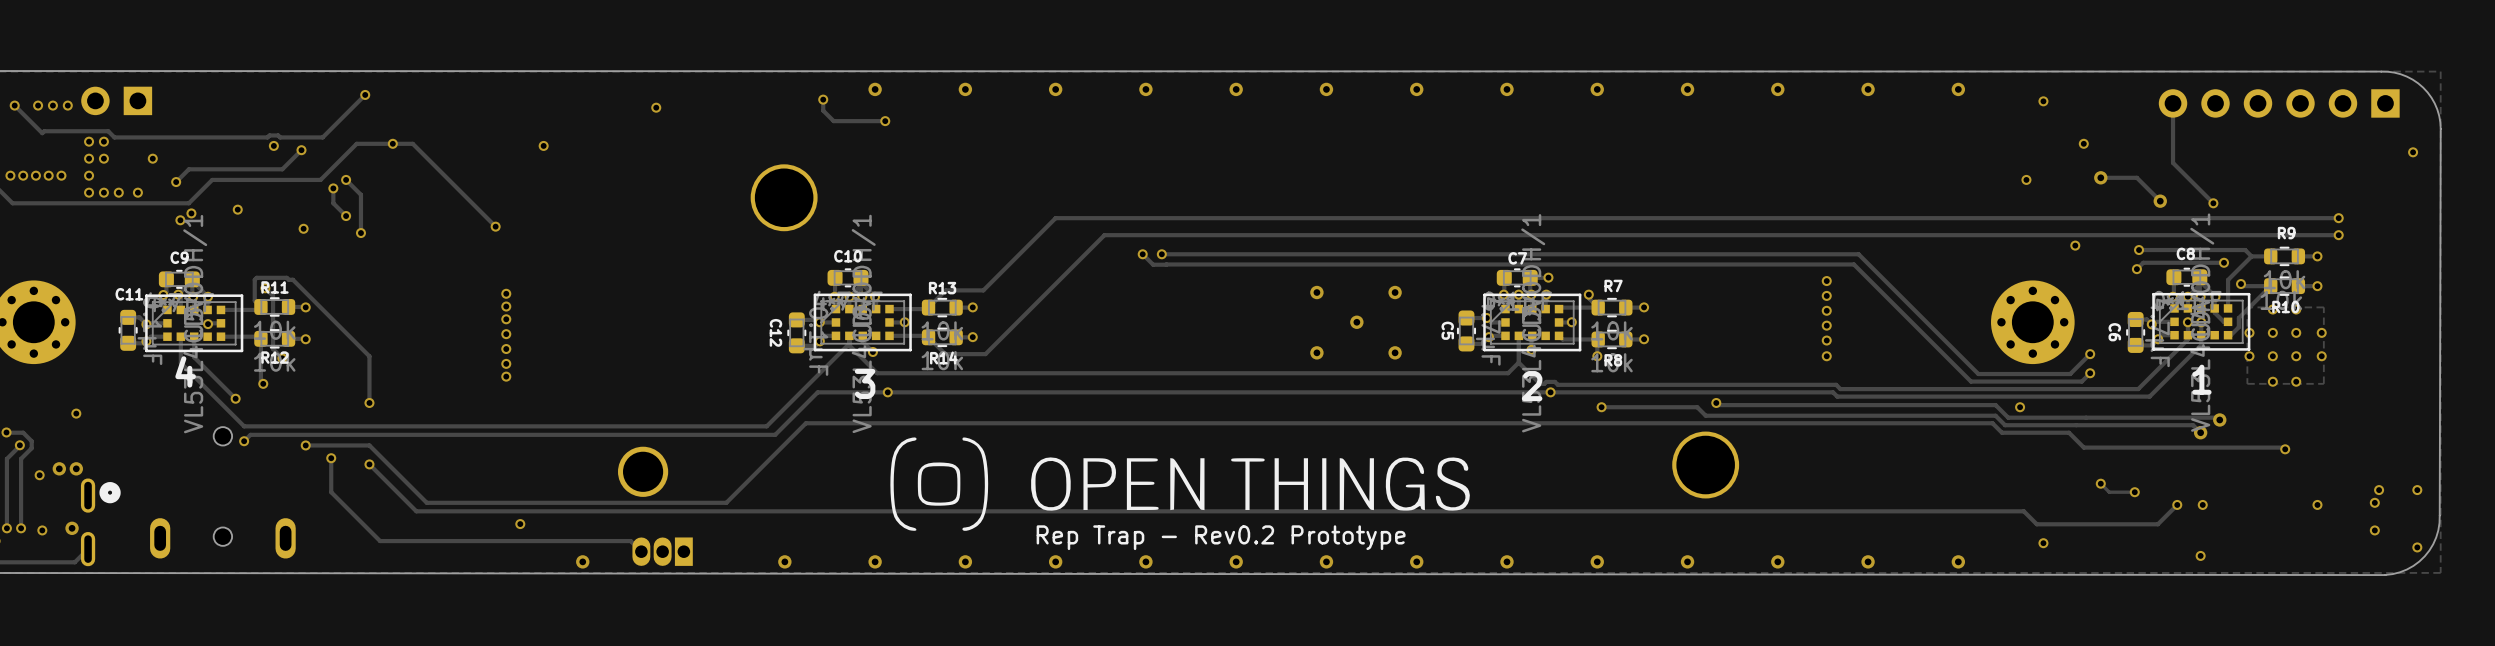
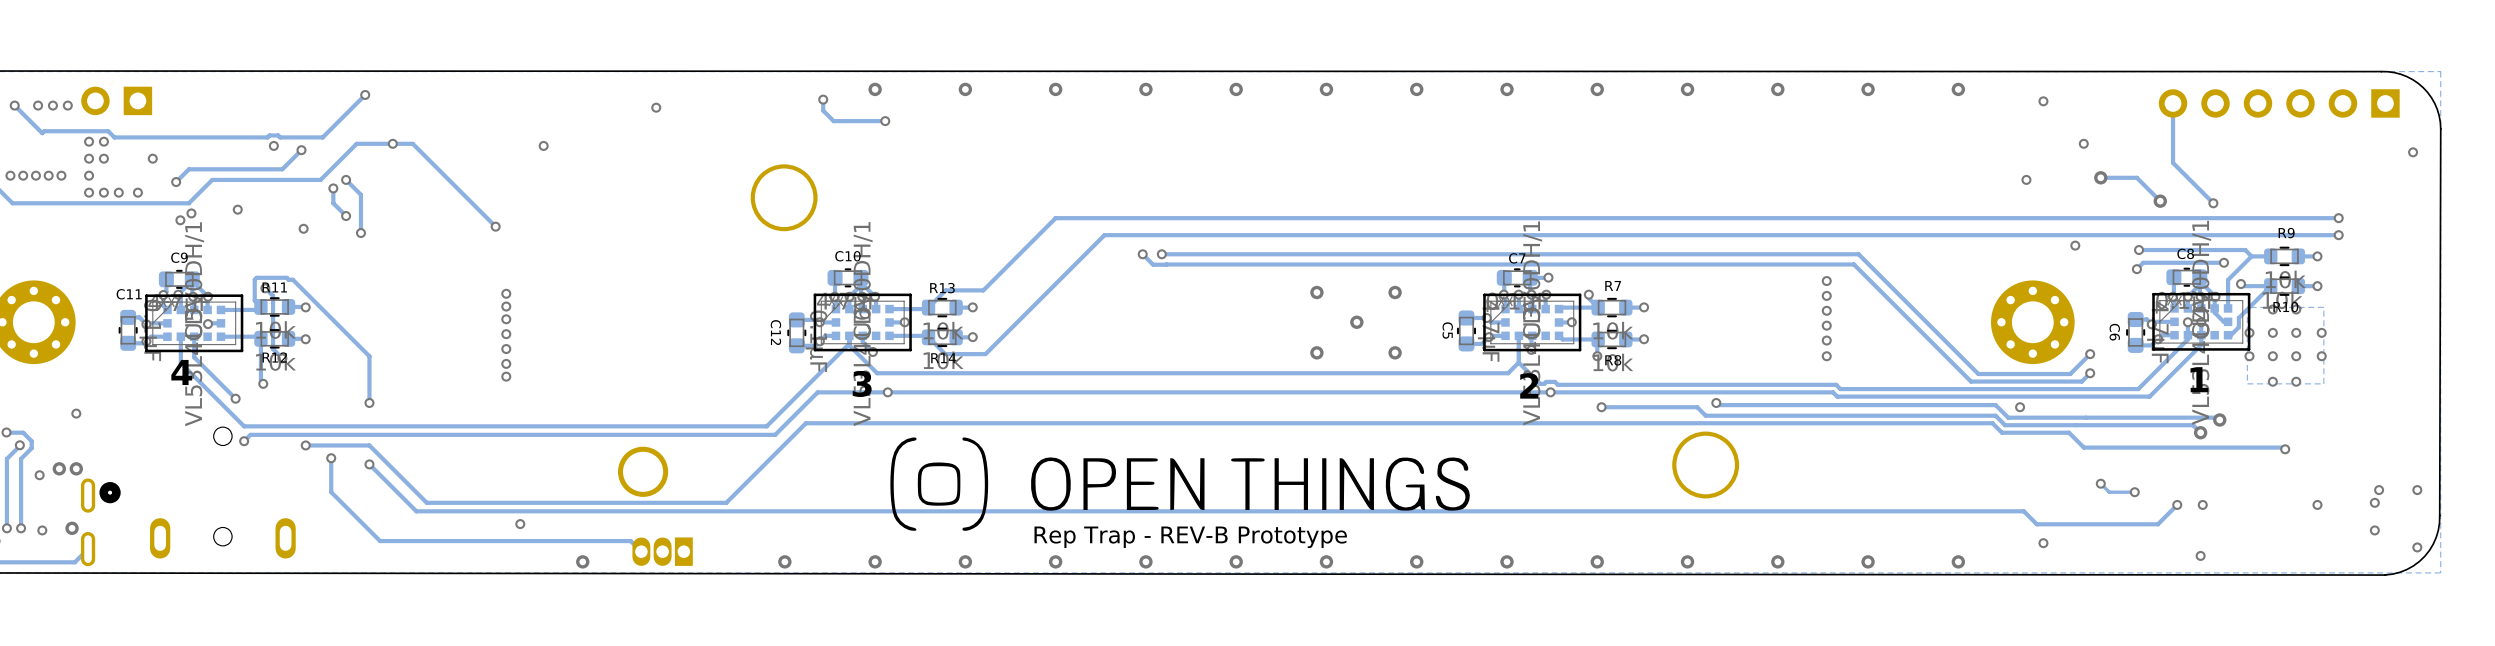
text: Rep Trap - Rev0.2 Prototype (1221, 537) -> Rep Trap - REV-B Prototype (1190, 537)

